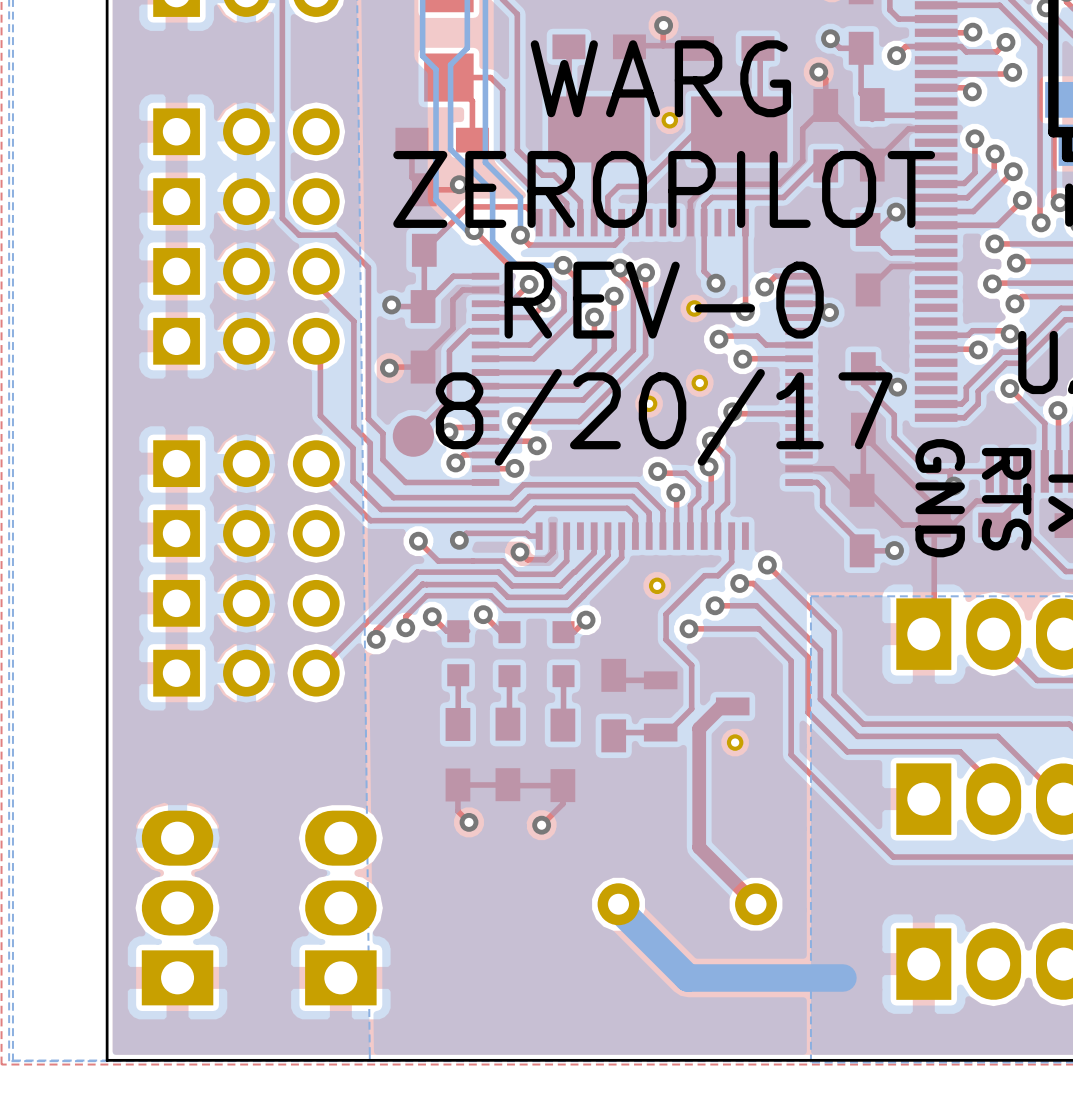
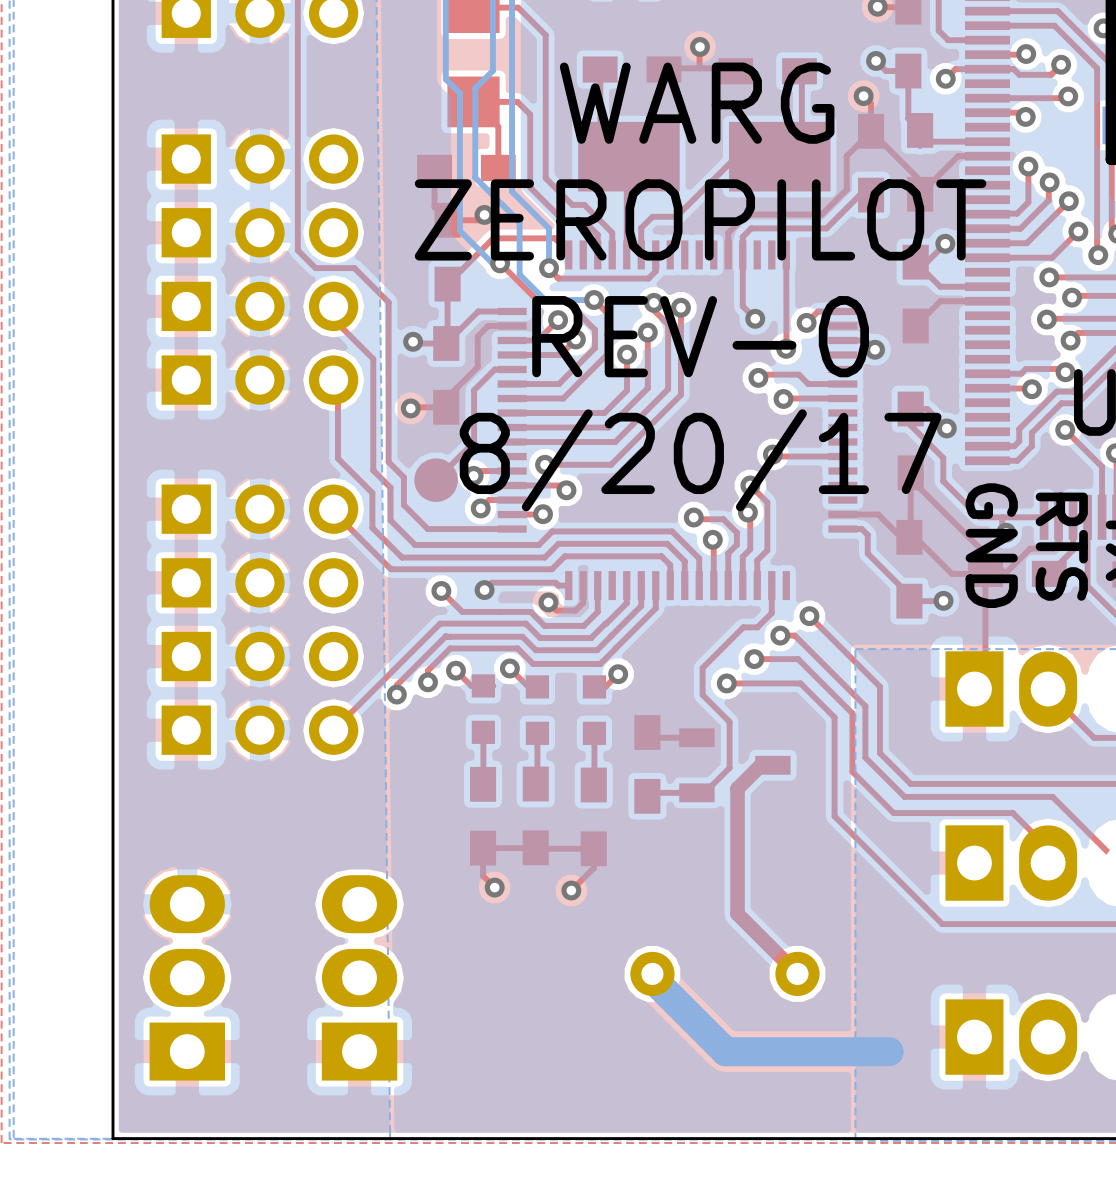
part: (669, 120) -> none
part: (694, 308) -> none
part: (699, 383) -> none
part: (649, 403) -> none
part: (657, 585) -> none
part: (735, 742) -> none

